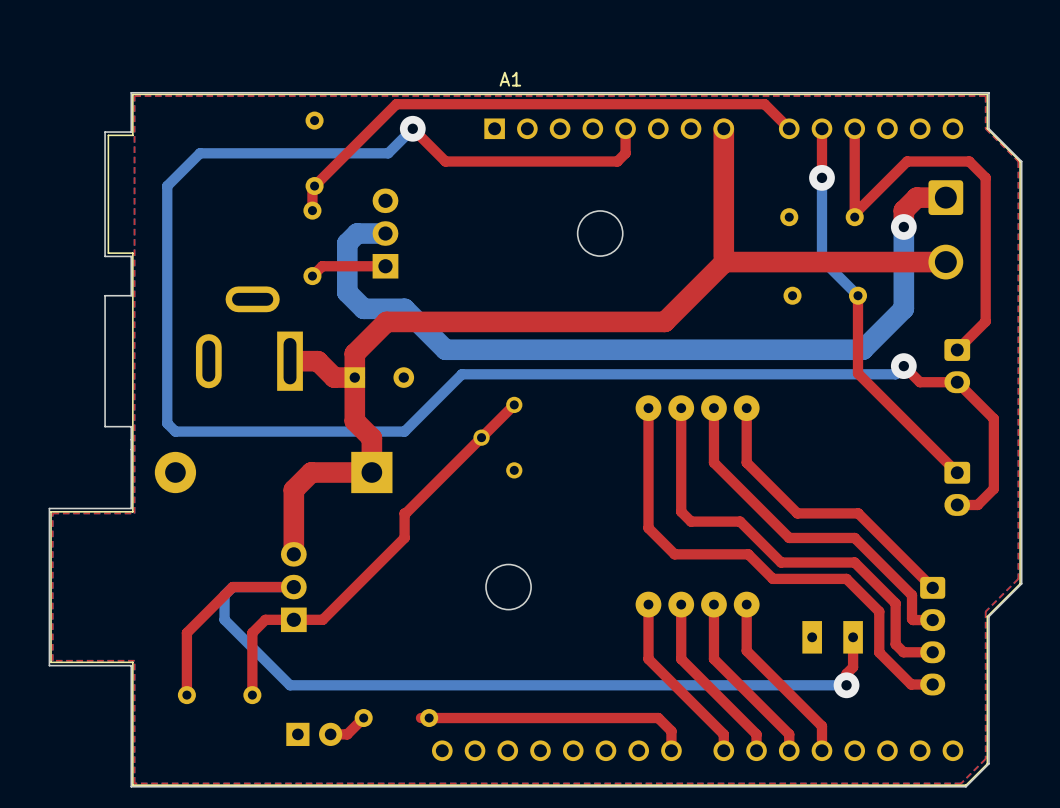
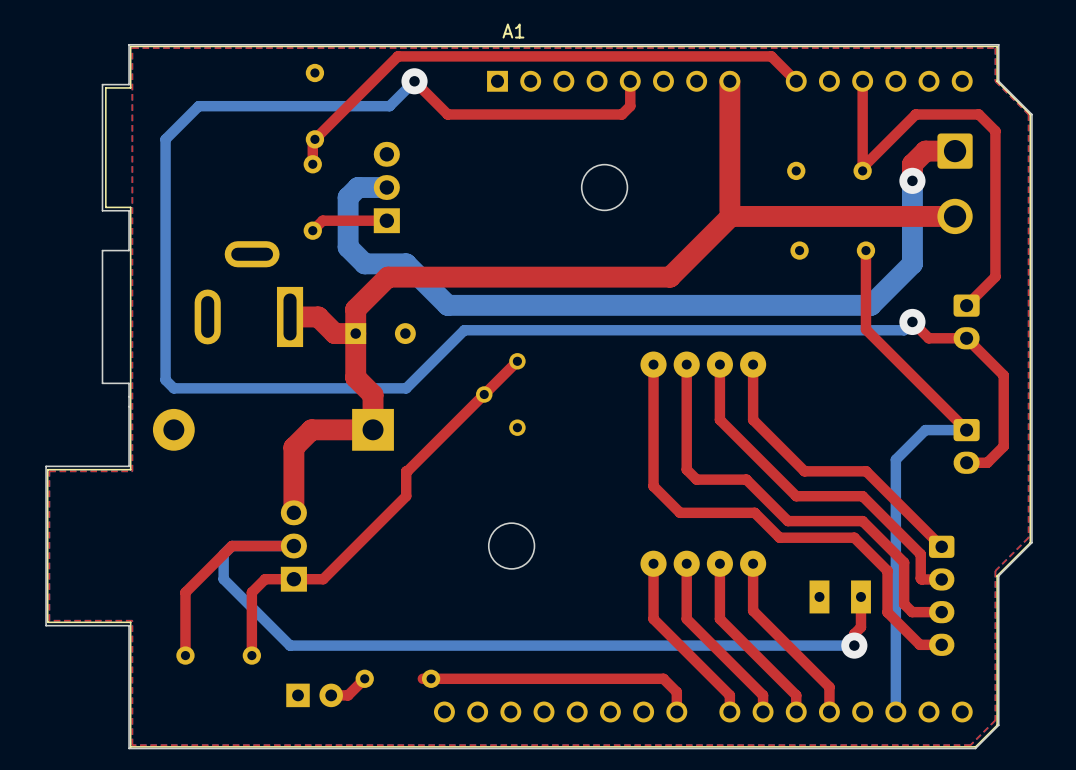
top track: (821, 128) (821, 177) -> none
bottom track: (821, 177) (821, 259) (858, 295) -> none
via: (821, 177) -> none
bottom track: none -> (966, 430) (925, 430) (895, 459) (895, 711)

